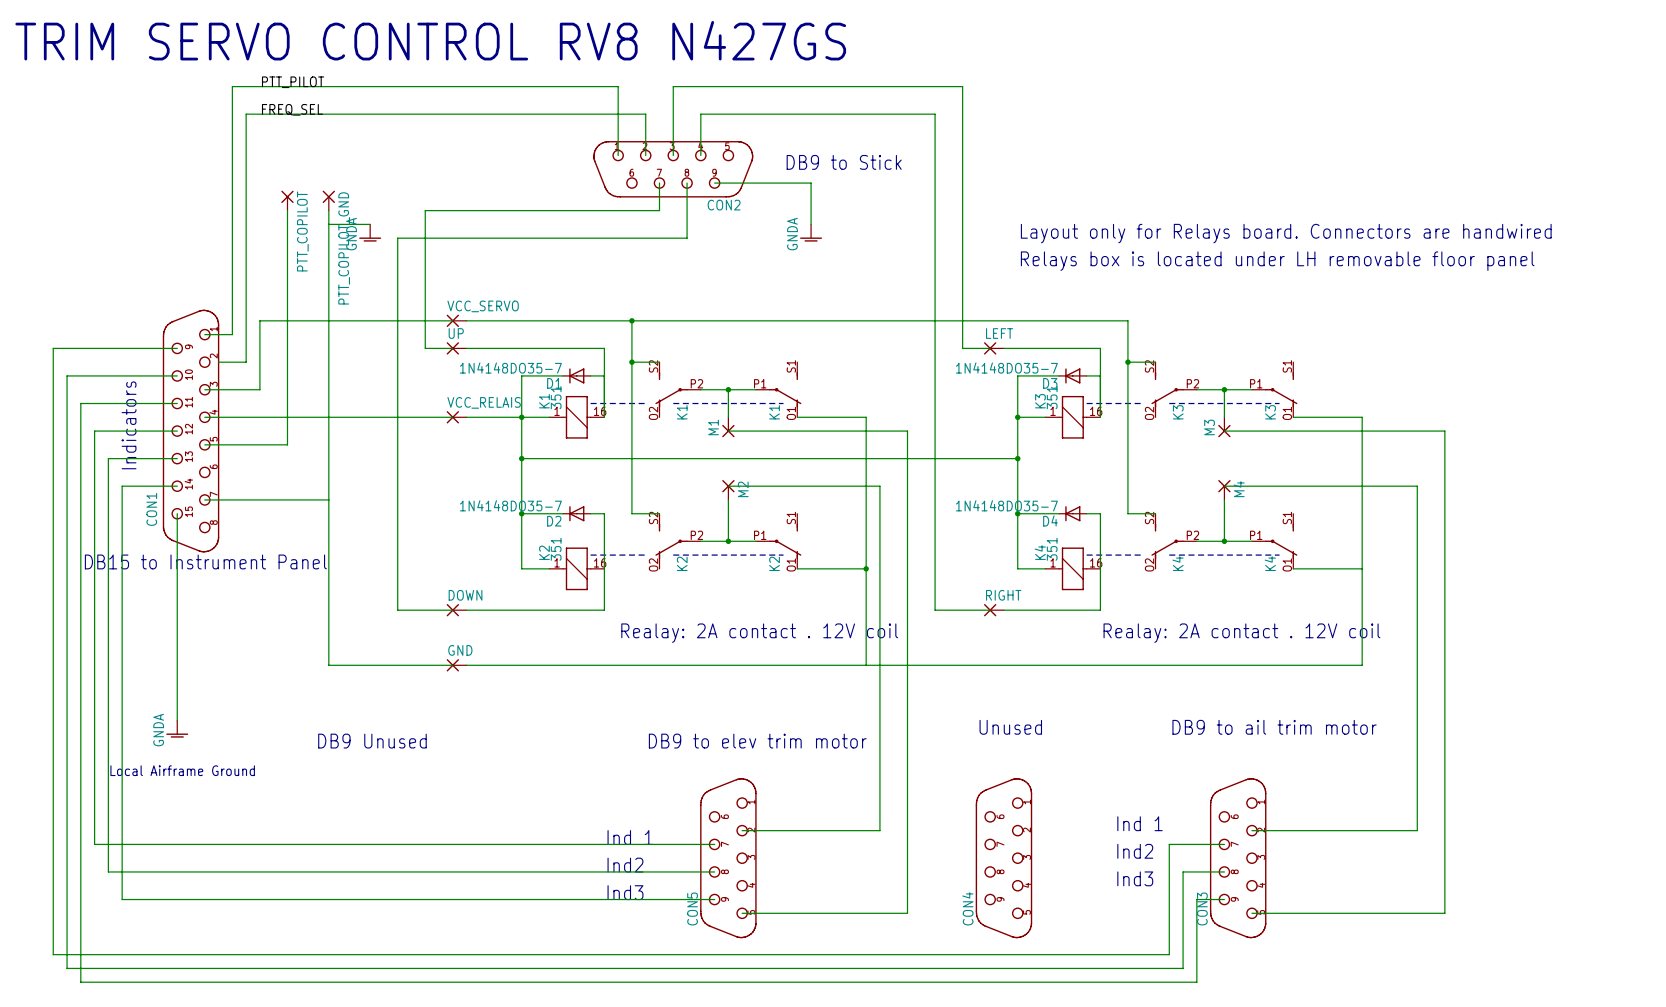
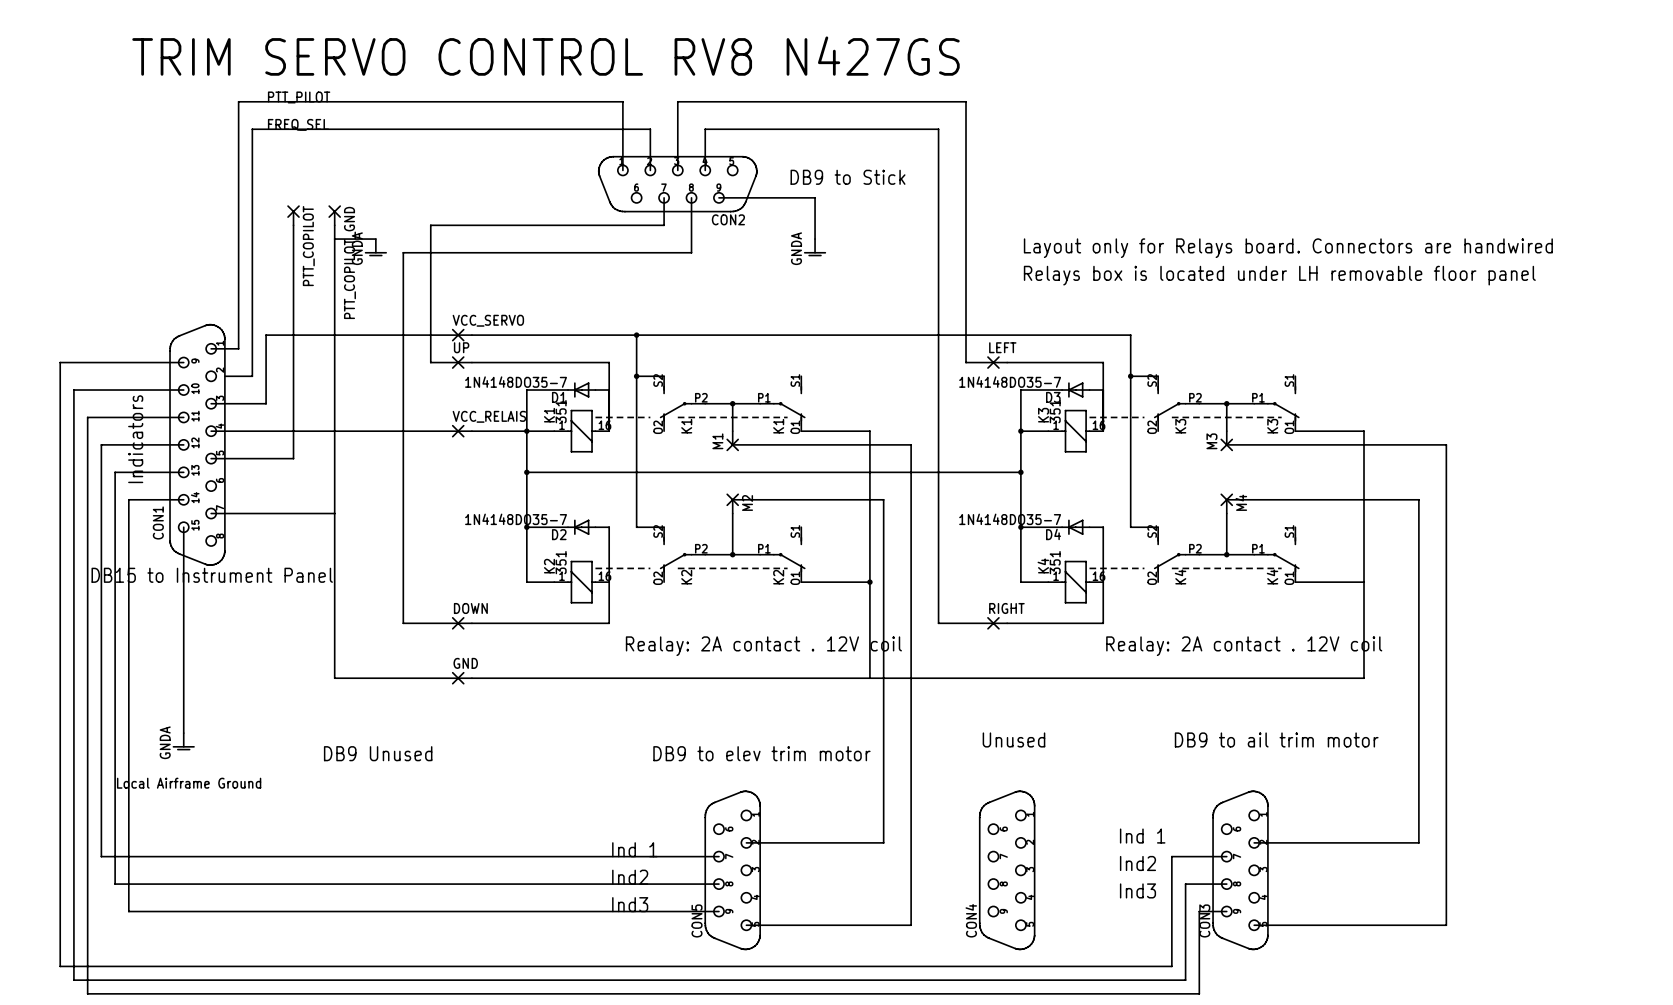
text position: TRIM SERVO CONTROL RV8 N427GS (430, 40) -> TRIM SERVO CONTROL RV8 N427GS (545, 56)

